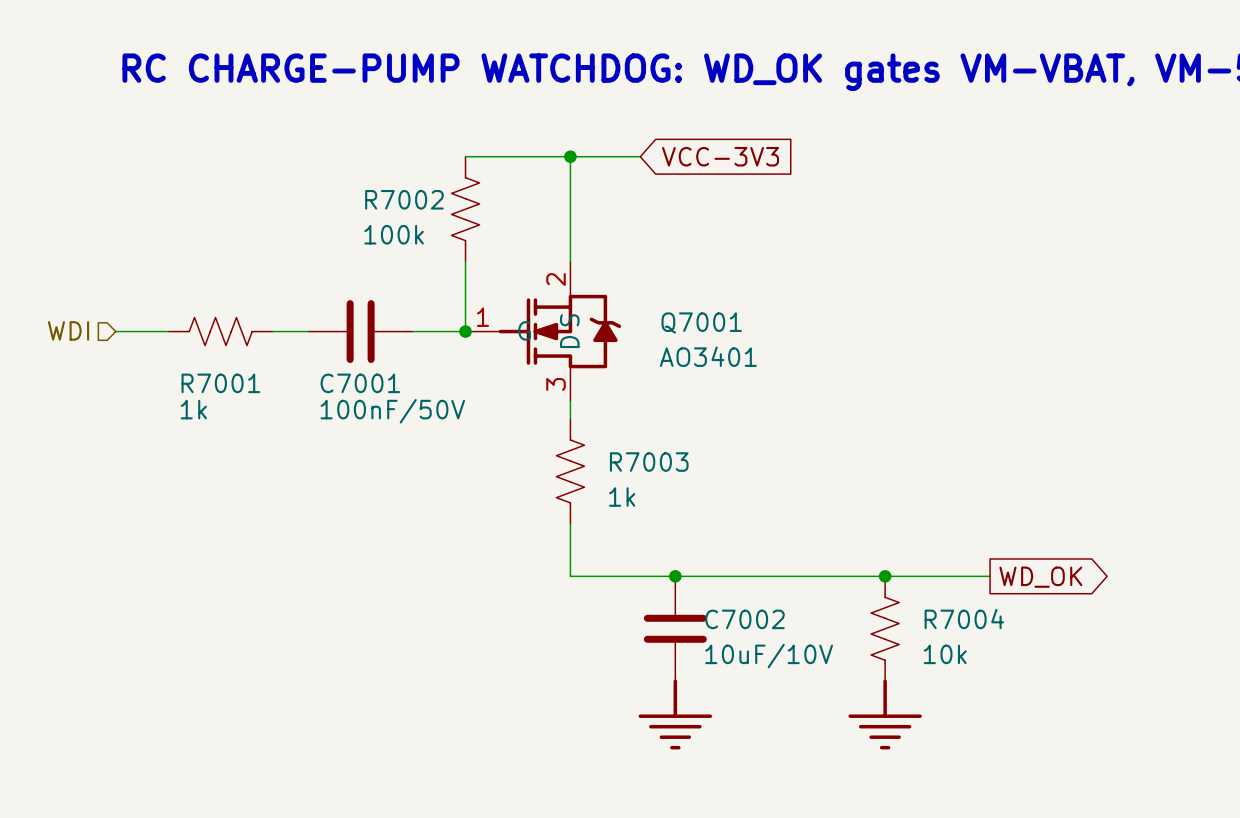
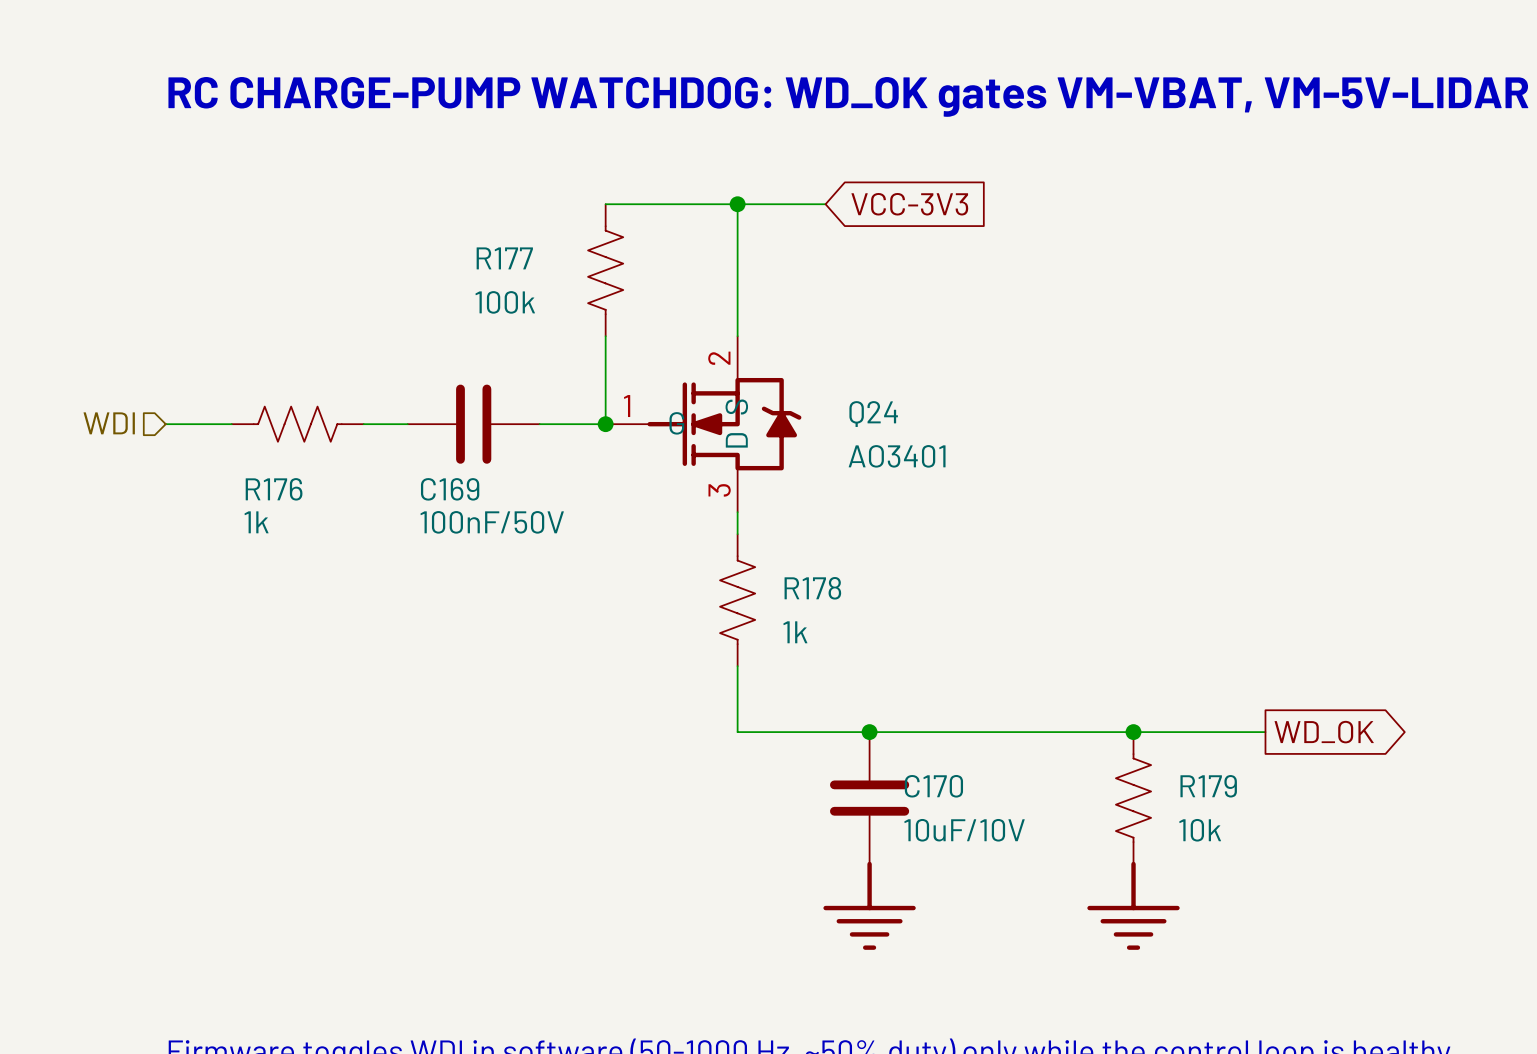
R7002 name: R7002 (404, 199) -> R177 (504, 258)
Q7001 name: Q7001 (701, 323) -> Q24 (873, 414)
R7001 name: R7001 (220, 383) -> R176 (274, 489)
C7001 name: C7001 (360, 383) -> C169 (450, 489)
R7003 name: R7003 (649, 462) -> R178 (812, 588)
R7004 name: R7004 (964, 618) -> R179 (1208, 786)
C7002 name: C7002 (744, 619) -> C170 (933, 786)

